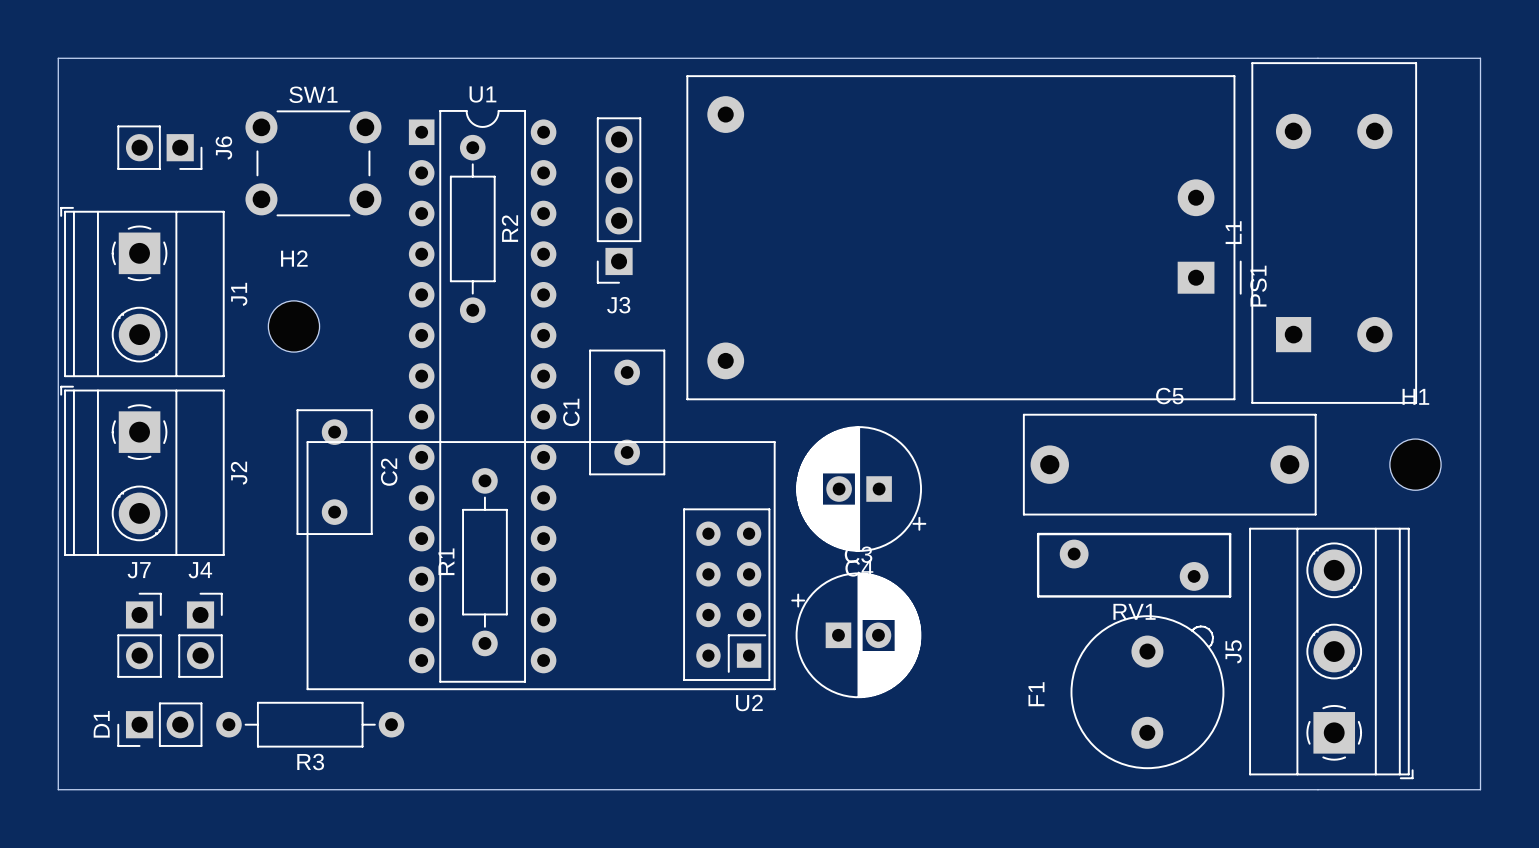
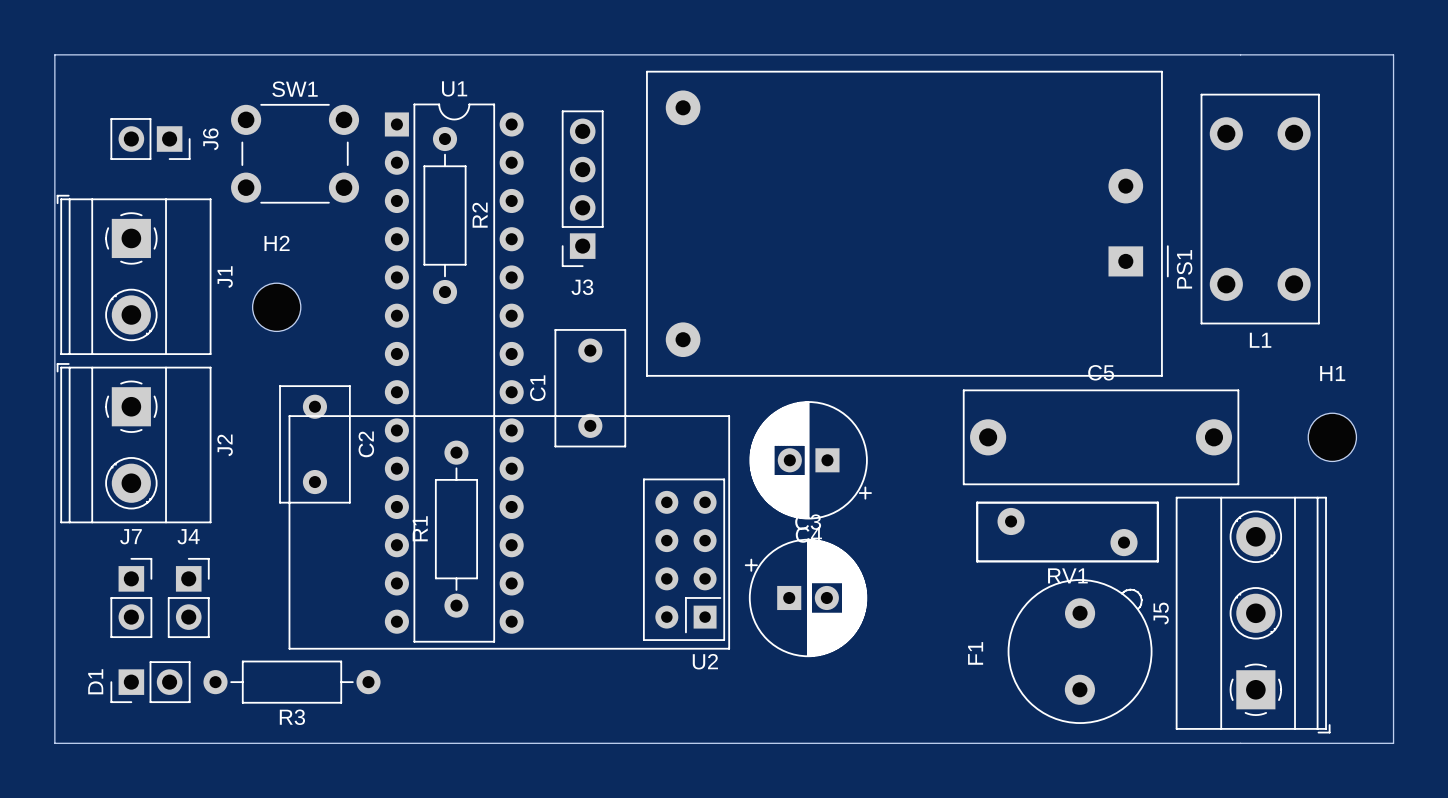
L1 footprint: [1251, 62, 1418, 404] -> [1200, 93, 1320, 325]
L1 name position: L1 (1233, 232) -> L1 (1260, 340)

